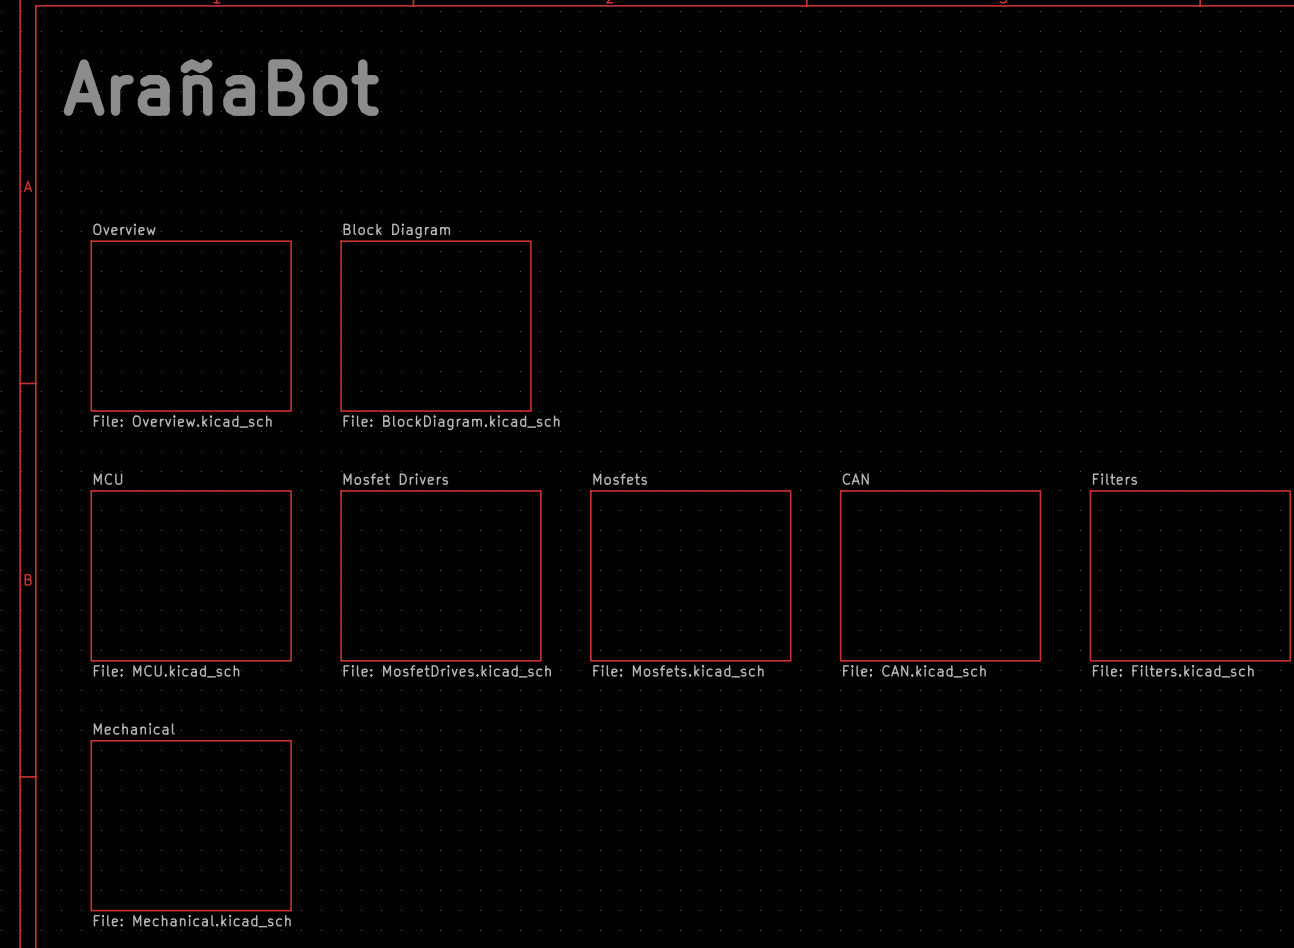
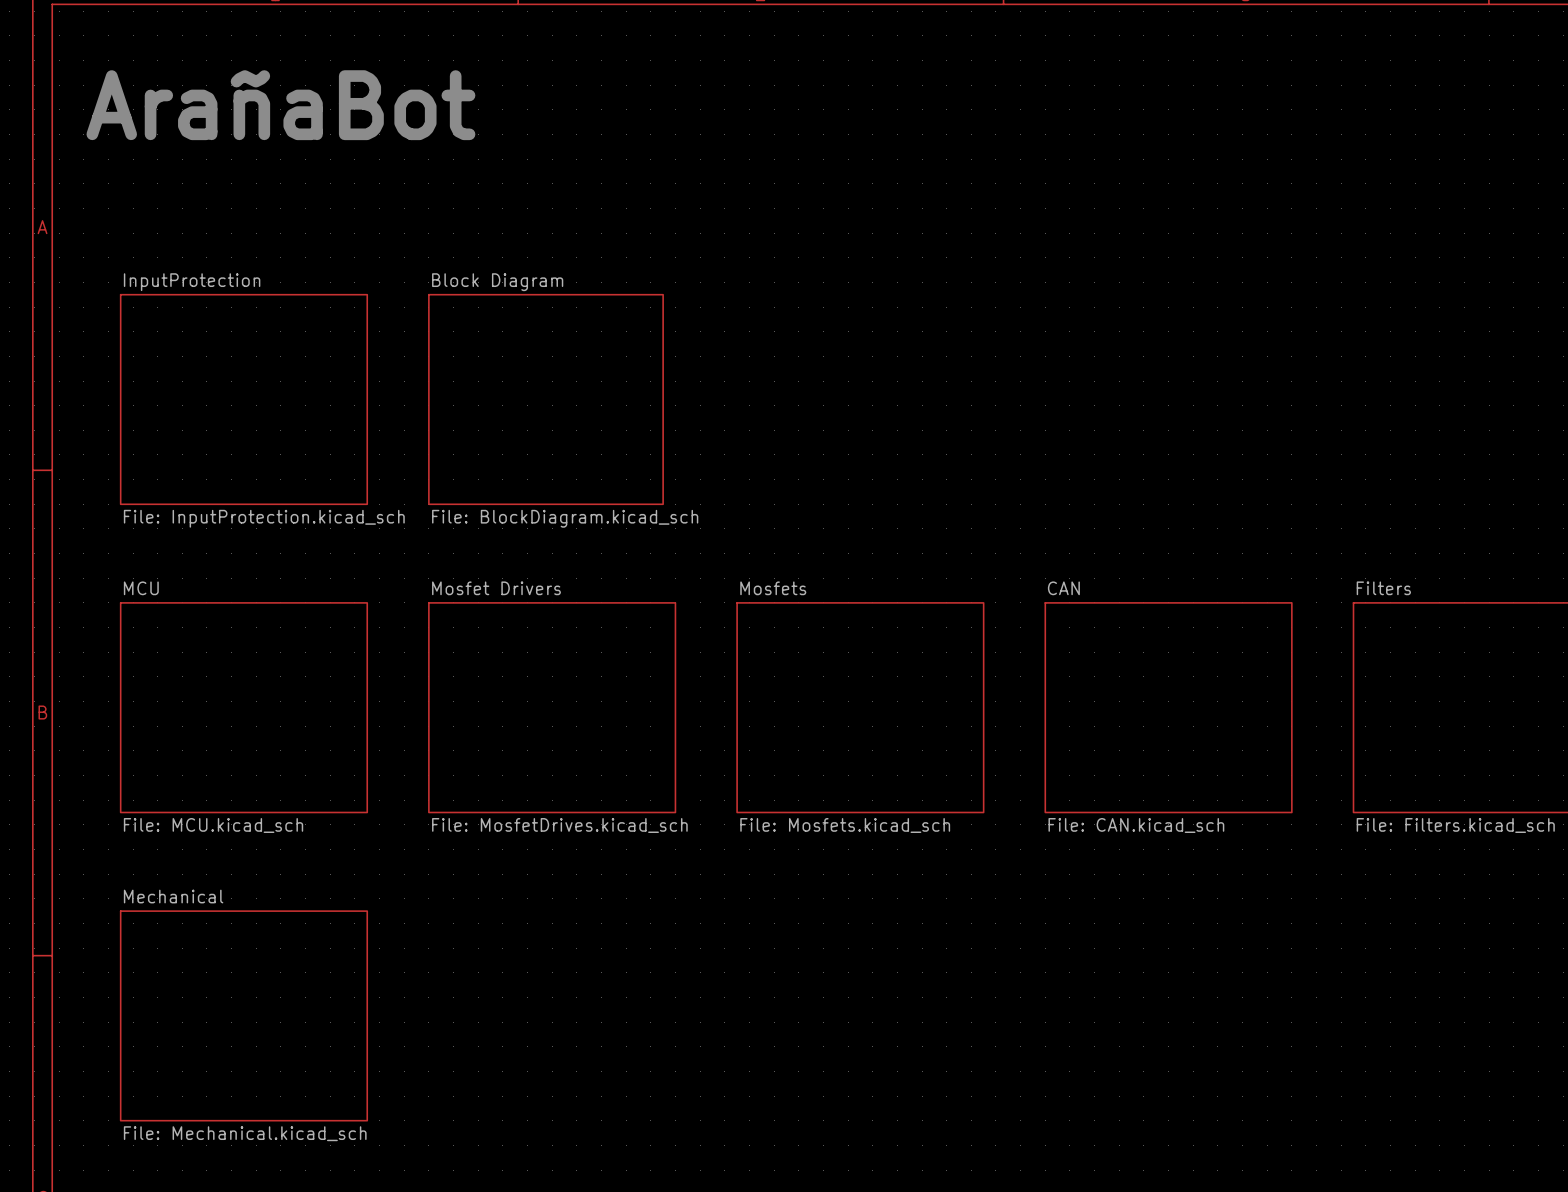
sheet Overview name: Overview (124, 229) -> InputProtection (192, 282)
sheet Overview value: File: Overview.kicad_sch (182, 421) -> File: InputProtection.kicad_sch (264, 518)

